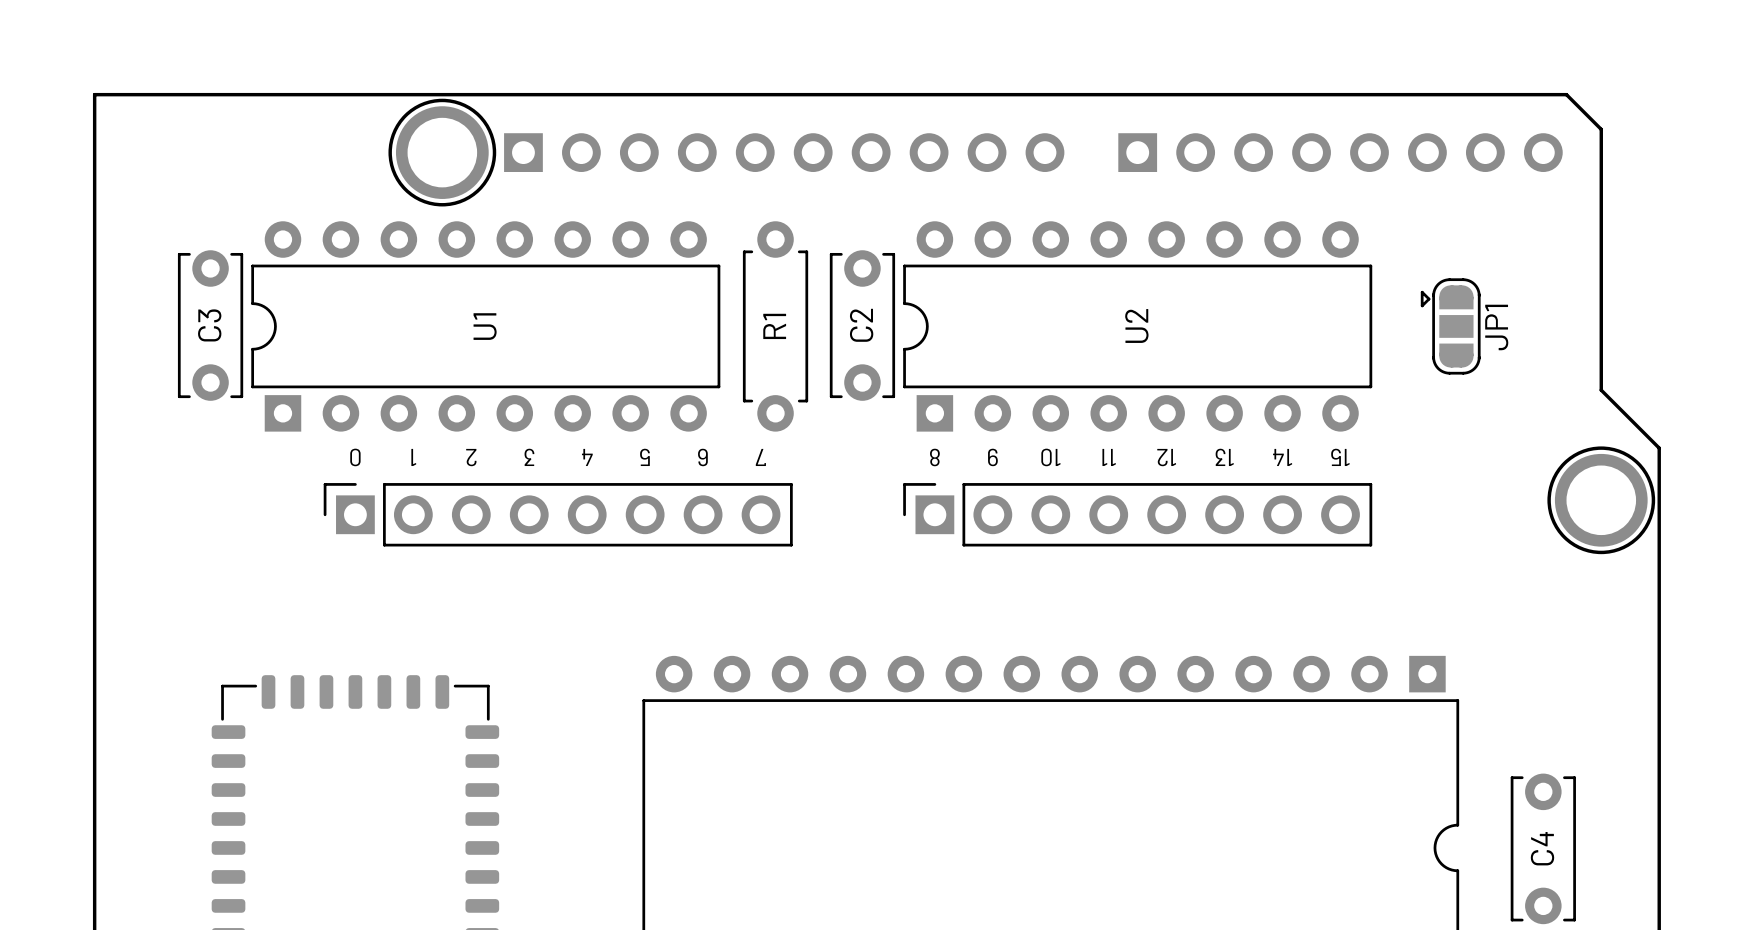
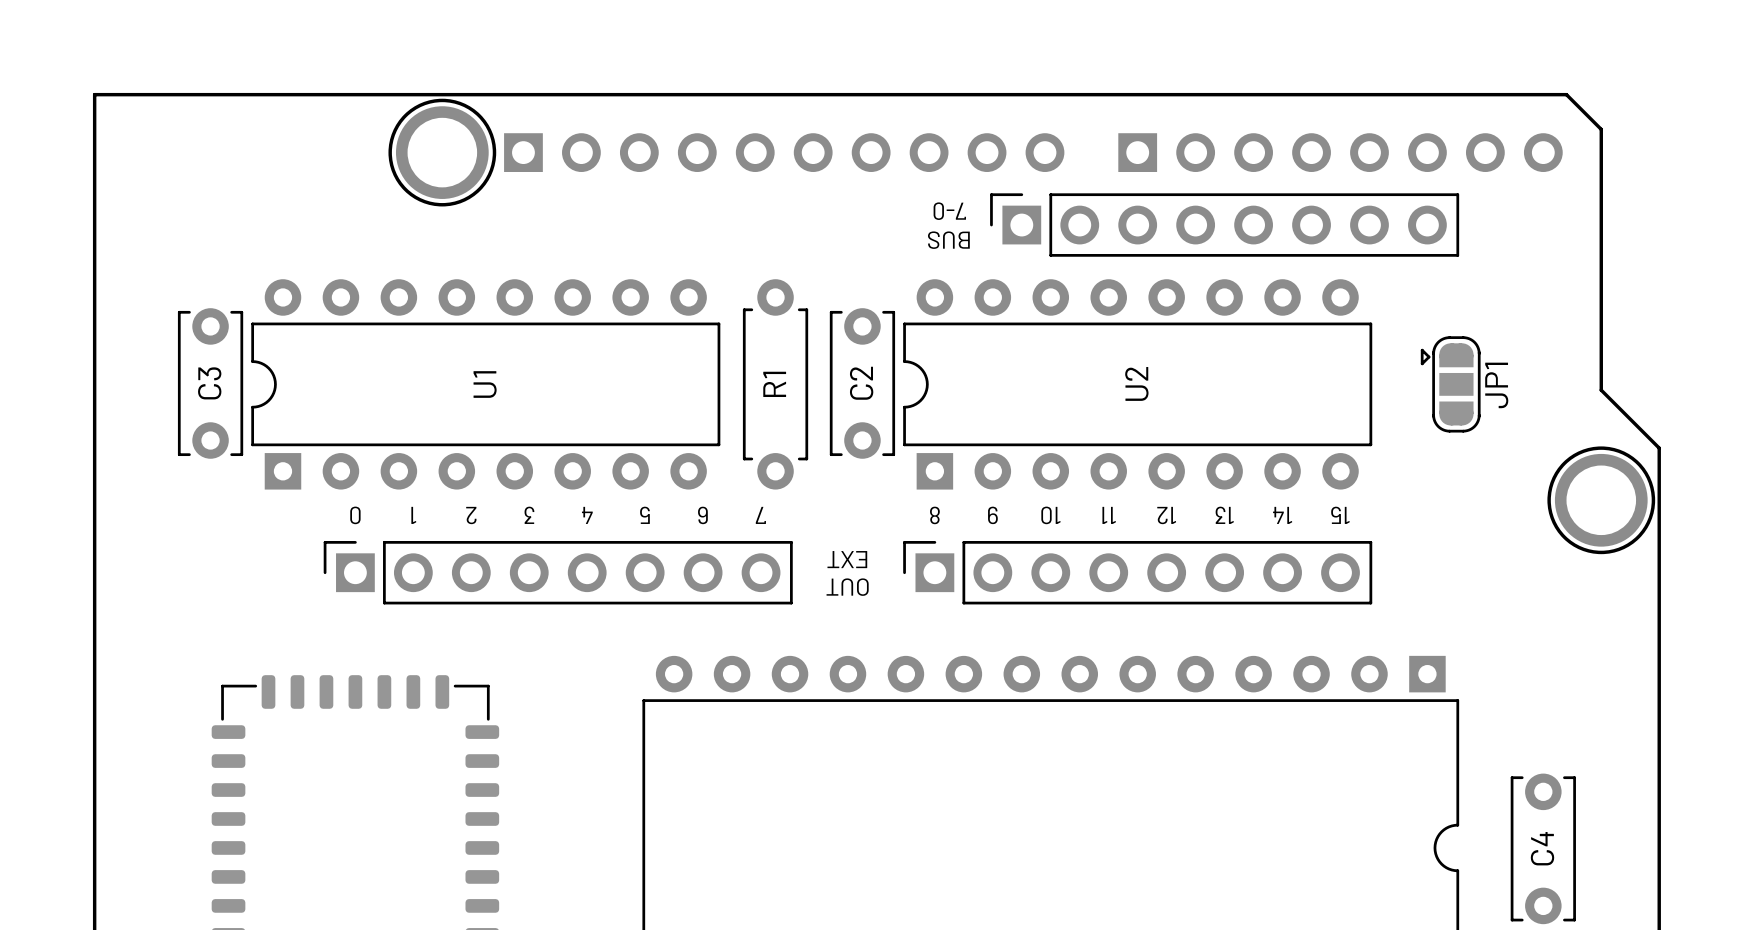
text: none -> 7-0 (949, 211)
part: none -> (1224, 225)
text: none -> BUS (948, 240)
C3 position: (210, 325) -> (210, 383)
C2 position: (862, 325) -> (862, 383)
U1 position: (485, 326) -> (485, 384)
R1 position: (775, 326) -> (775, 384)
U2 position: (1137, 326) -> (1137, 384)
JP1 position: (1450, 326) -> (1450, 384)
text position: 0 (355, 457) -> 0 (355, 515)
text position: 1 (413, 457) -> 1 (413, 515)
text position: 2 (471, 457) -> 2 (471, 515)
text position: 3 (529, 457) -> 3 (529, 515)
text position: 4 (587, 457) -> 4 (587, 515)
text position: 5 (644, 457) -> 5 (644, 515)
text position: 6 (702, 457) -> 6 (702, 515)
text position: 7 (760, 457) -> 7 (760, 515)
text position: 8 (934, 457) -> 8 (934, 515)
text position: 9 (992, 457) -> 9 (992, 515)
text position: 10 (1050, 457) -> 10 (1050, 515)
text position: 11 (1109, 457) -> 11 (1109, 515)
text position: 12 (1166, 457) -> 12 (1166, 515)
text position: 13 (1224, 457) -> 13 (1224, 515)
text position: 14 (1282, 457) -> 14 (1282, 515)
text position: 15 (1340, 457) -> 15 (1340, 515)
part position: (558, 514) -> (558, 572)
part position: (1137, 514) -> (1137, 572)
text: none -> EXT (847, 559)
text: none -> OUT (847, 587)

